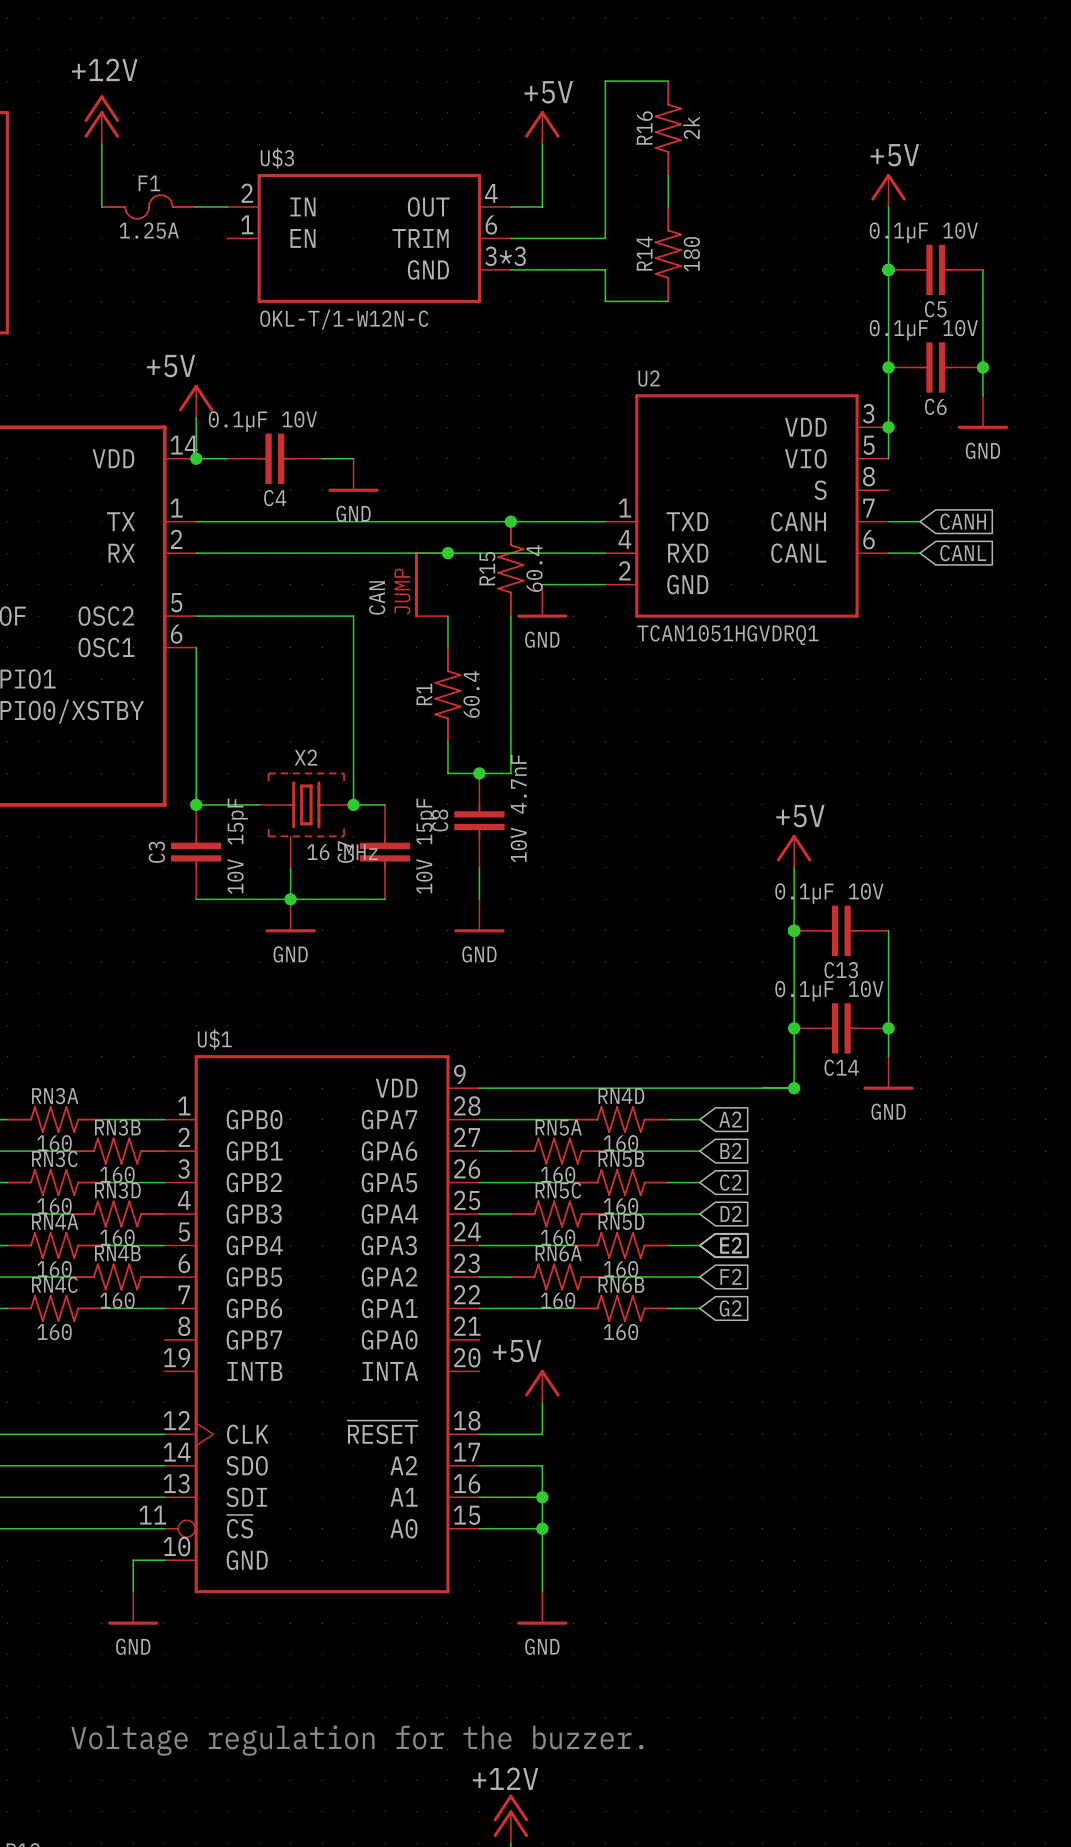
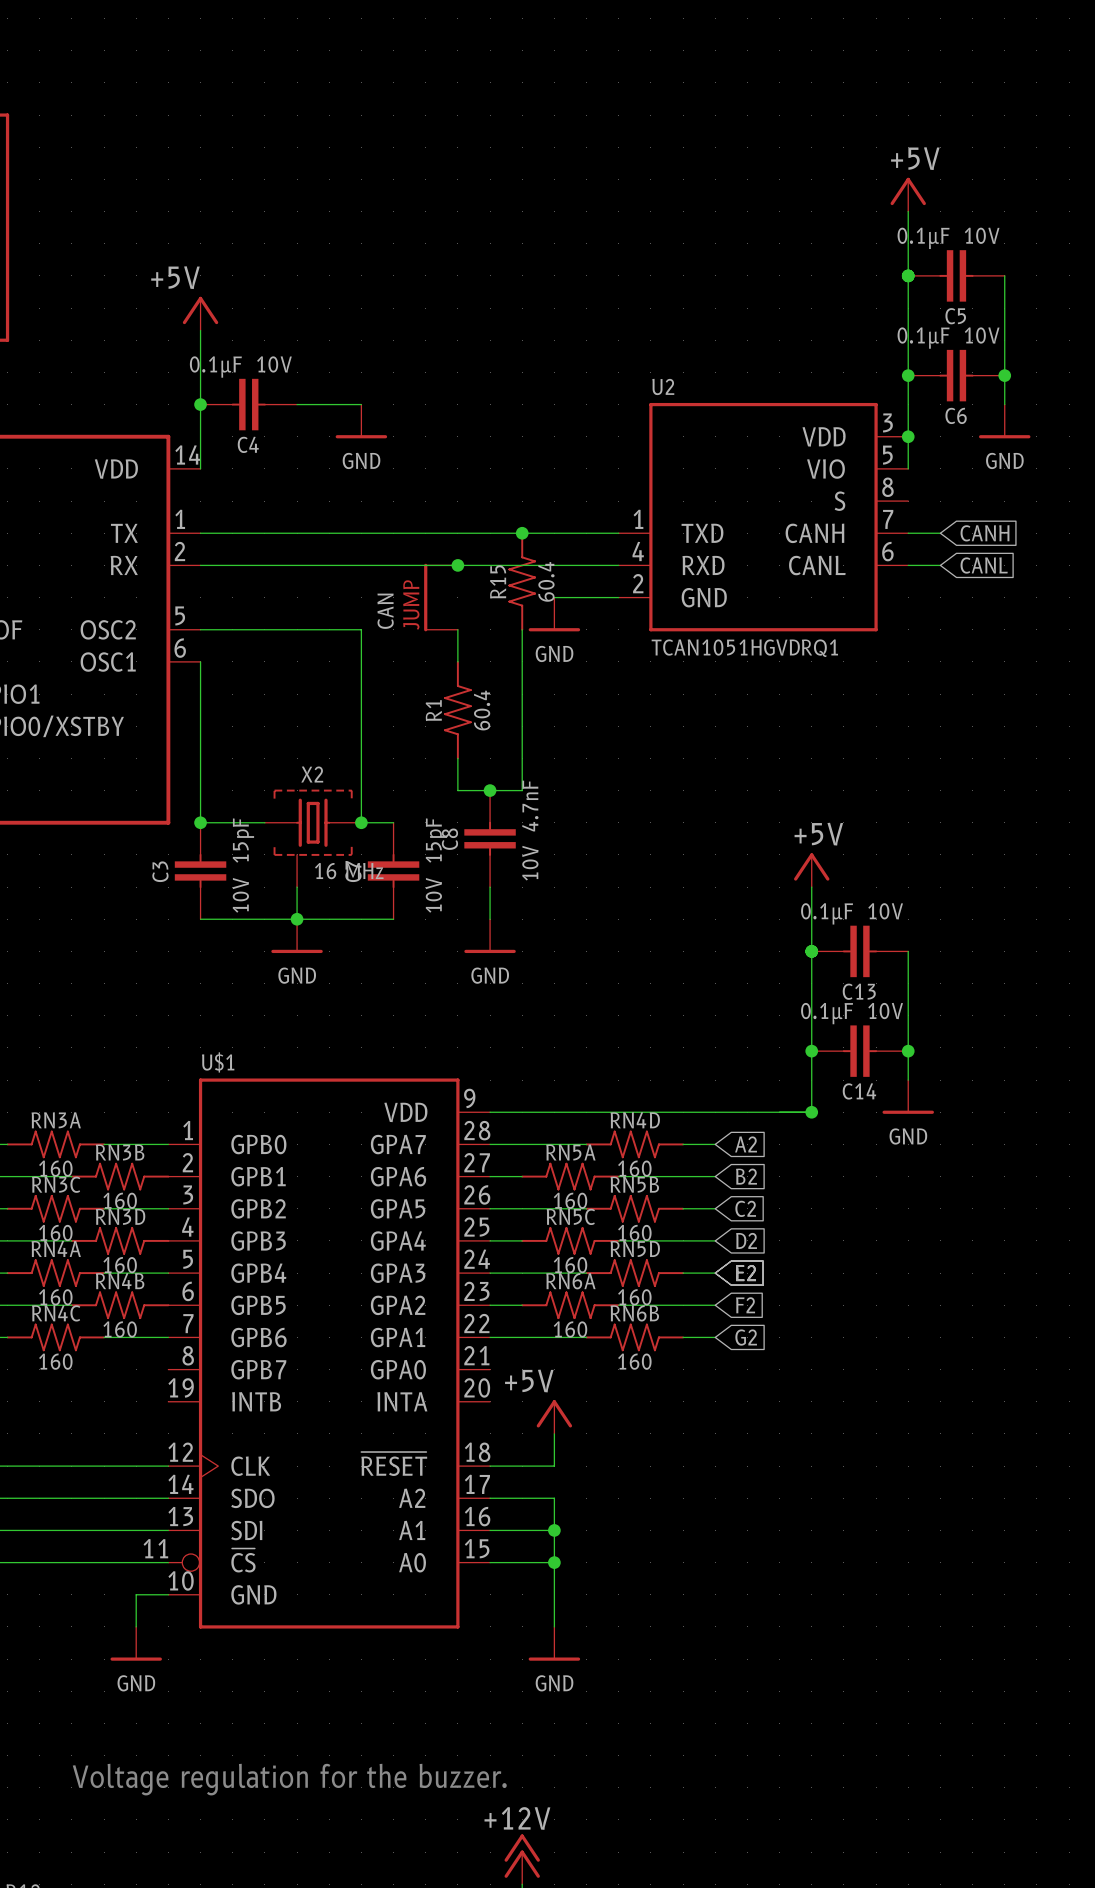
wire: (668, 81) (605, 81) (605, 238) (510, 238) -> none
power symbol: +12V (101, 119) -> none
power symbol: +5V (542, 127) -> none
R16: (668, 128) -> none
wire: (101, 144) (101, 206) -> none
wire: (542, 144) (542, 206) (510, 206) -> none
wire: (668, 175) (668, 206) -> none
F1: (148, 206) -> none
wire: (196, 206) (227, 206) -> none
U$3: (369, 238) -> none
R14: (668, 254) -> none
wire: (510, 269) (605, 269) (605, 301) (668, 301) -> none
wire: none -> (200, 330) (200, 427)
wire: none -> (297, 404) (361, 404)
power symbol position: +5V (196, 401) -> +5V (200, 313)
wire: (196, 458) (227, 458) -> none
junction position: (196, 458) -> (200, 404)
C4 position: (274, 458) -> (248, 404)
wire: (322, 458) (353, 458) -> none
power symbol position: GND (353, 475) -> GND (361, 421)

